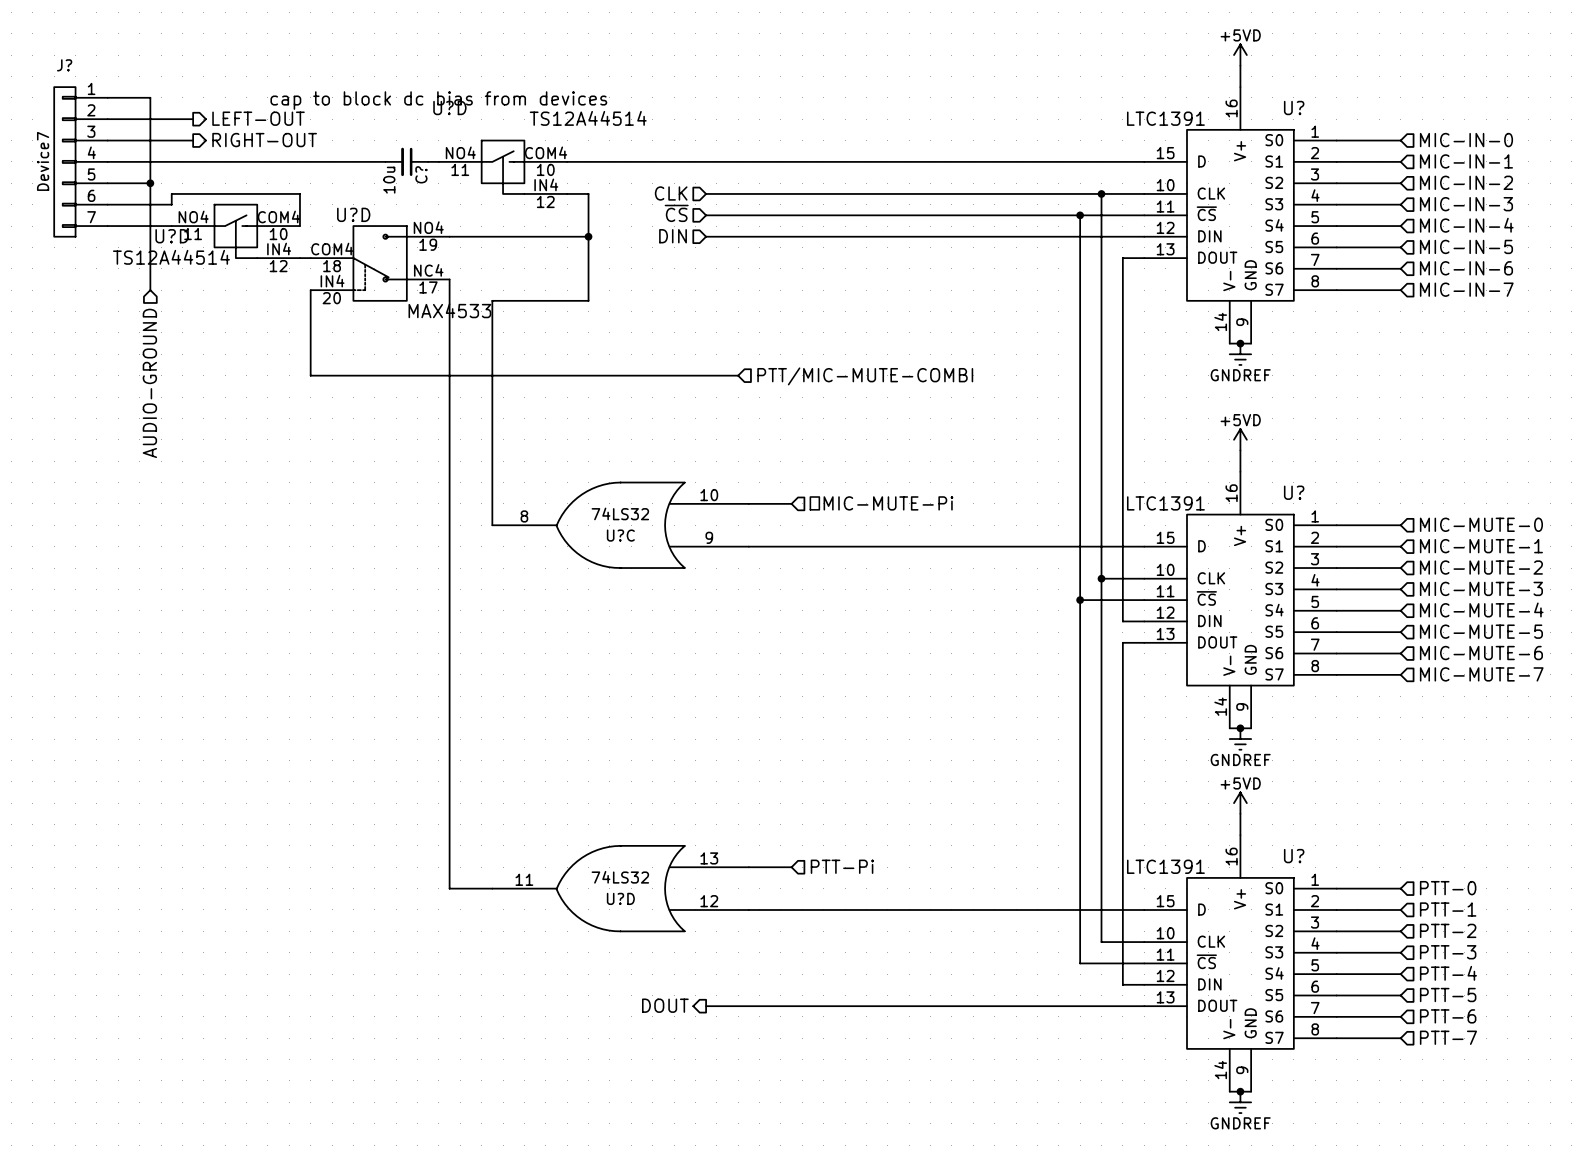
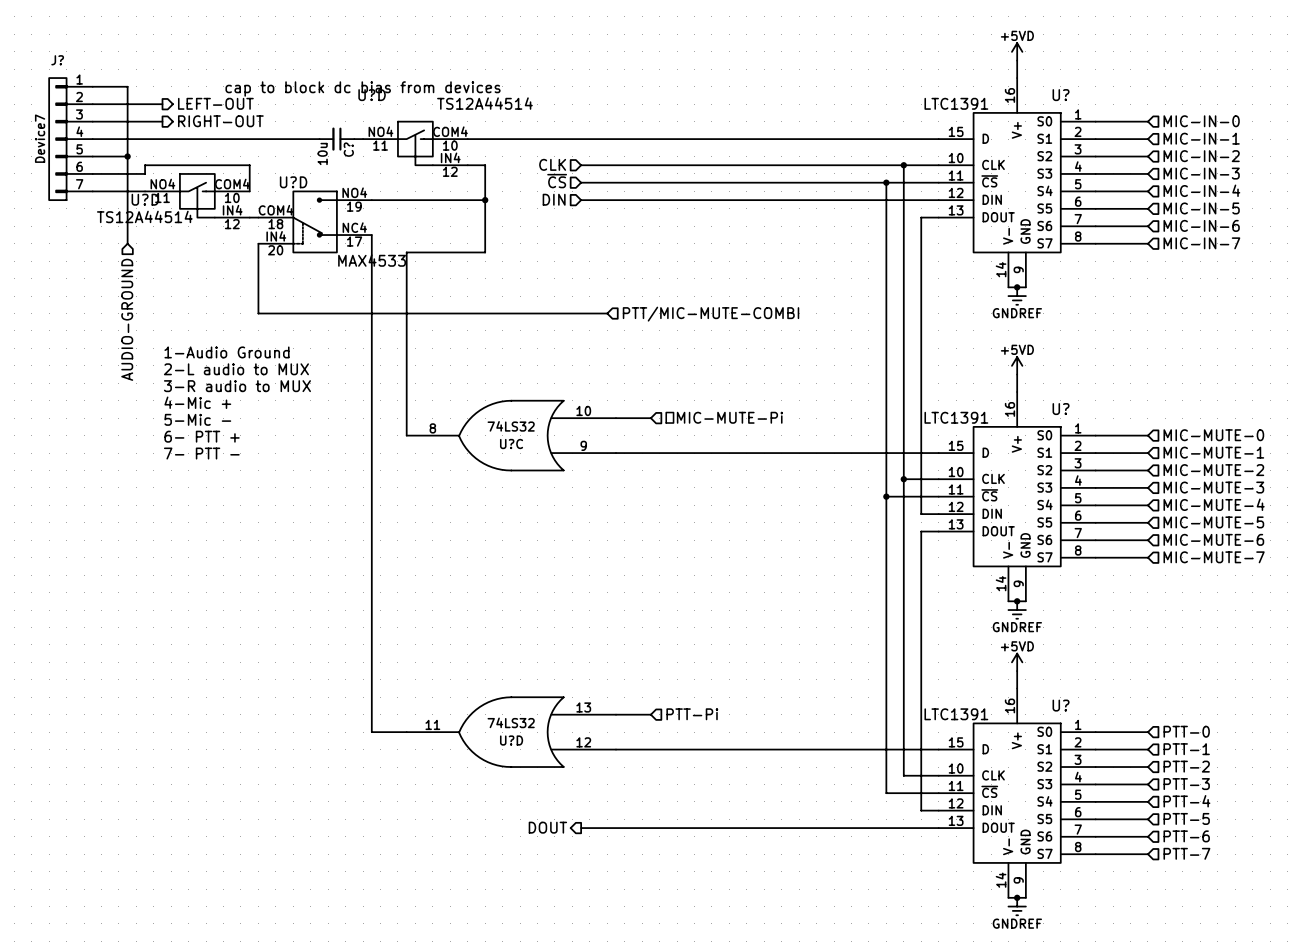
text: none -> 1-Audio Ground (226, 352)
text: none -> 2-L audio to MUX (236, 369)
text: none -> 3-R audio to MUX (237, 386)
text: none -> 4-Mic + (197, 402)
text: none -> 5-Mic - (197, 419)
text: none -> 6- PTT + (202, 436)
text: none -> 7- PTT - (201, 453)

